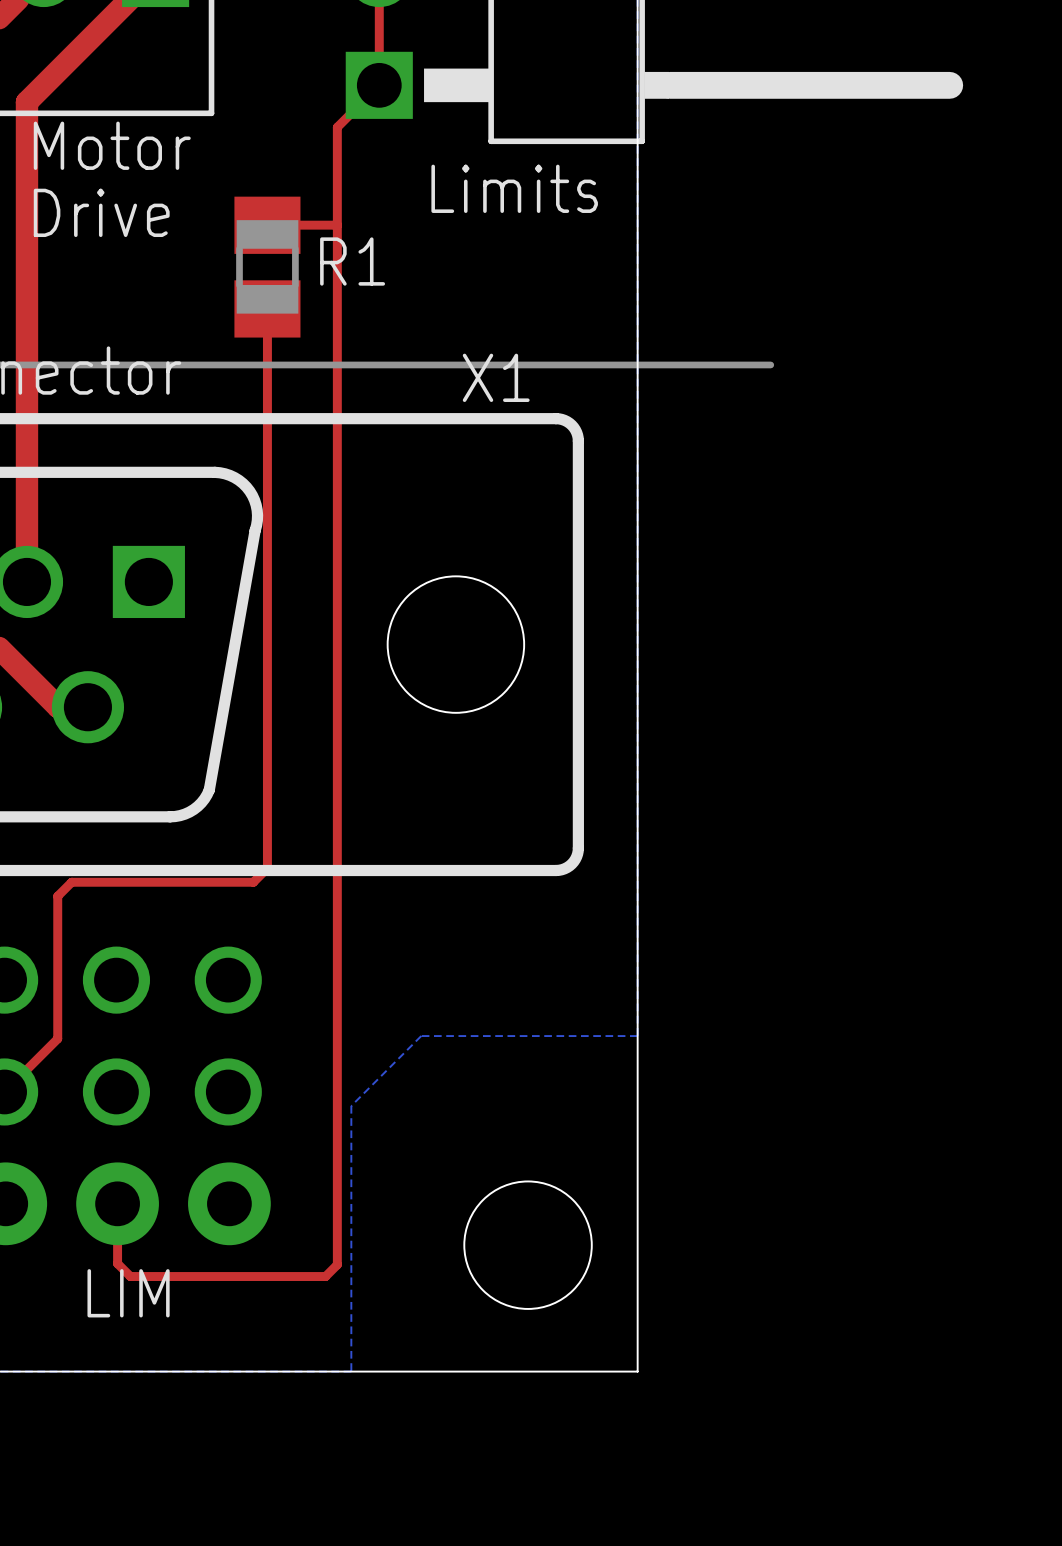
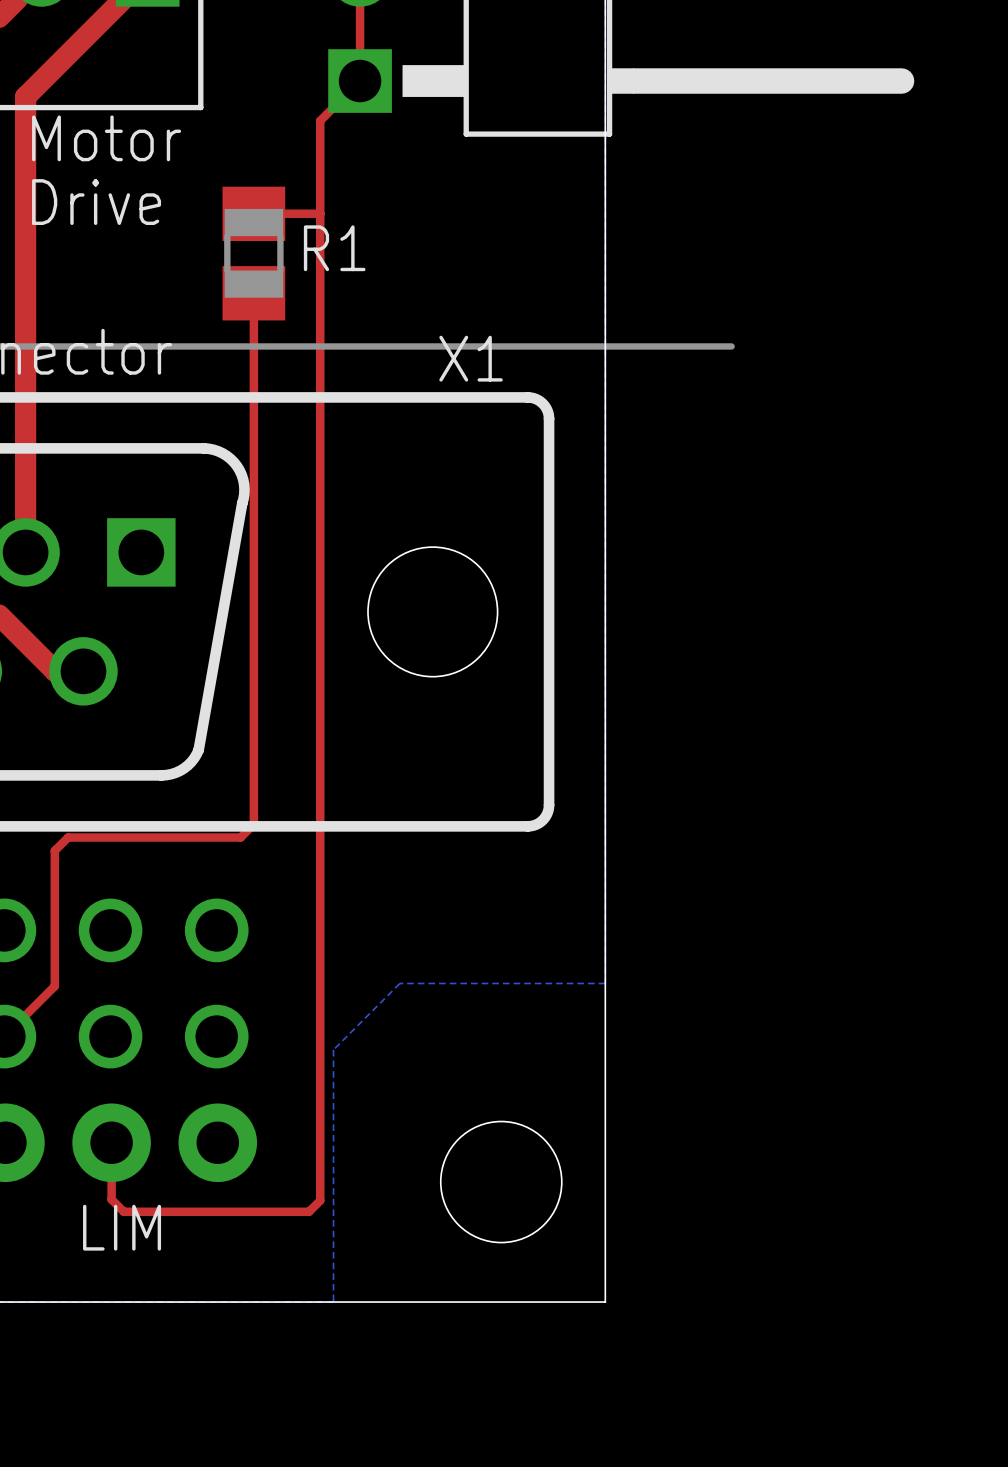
text: Limits (514, 188) -> none

